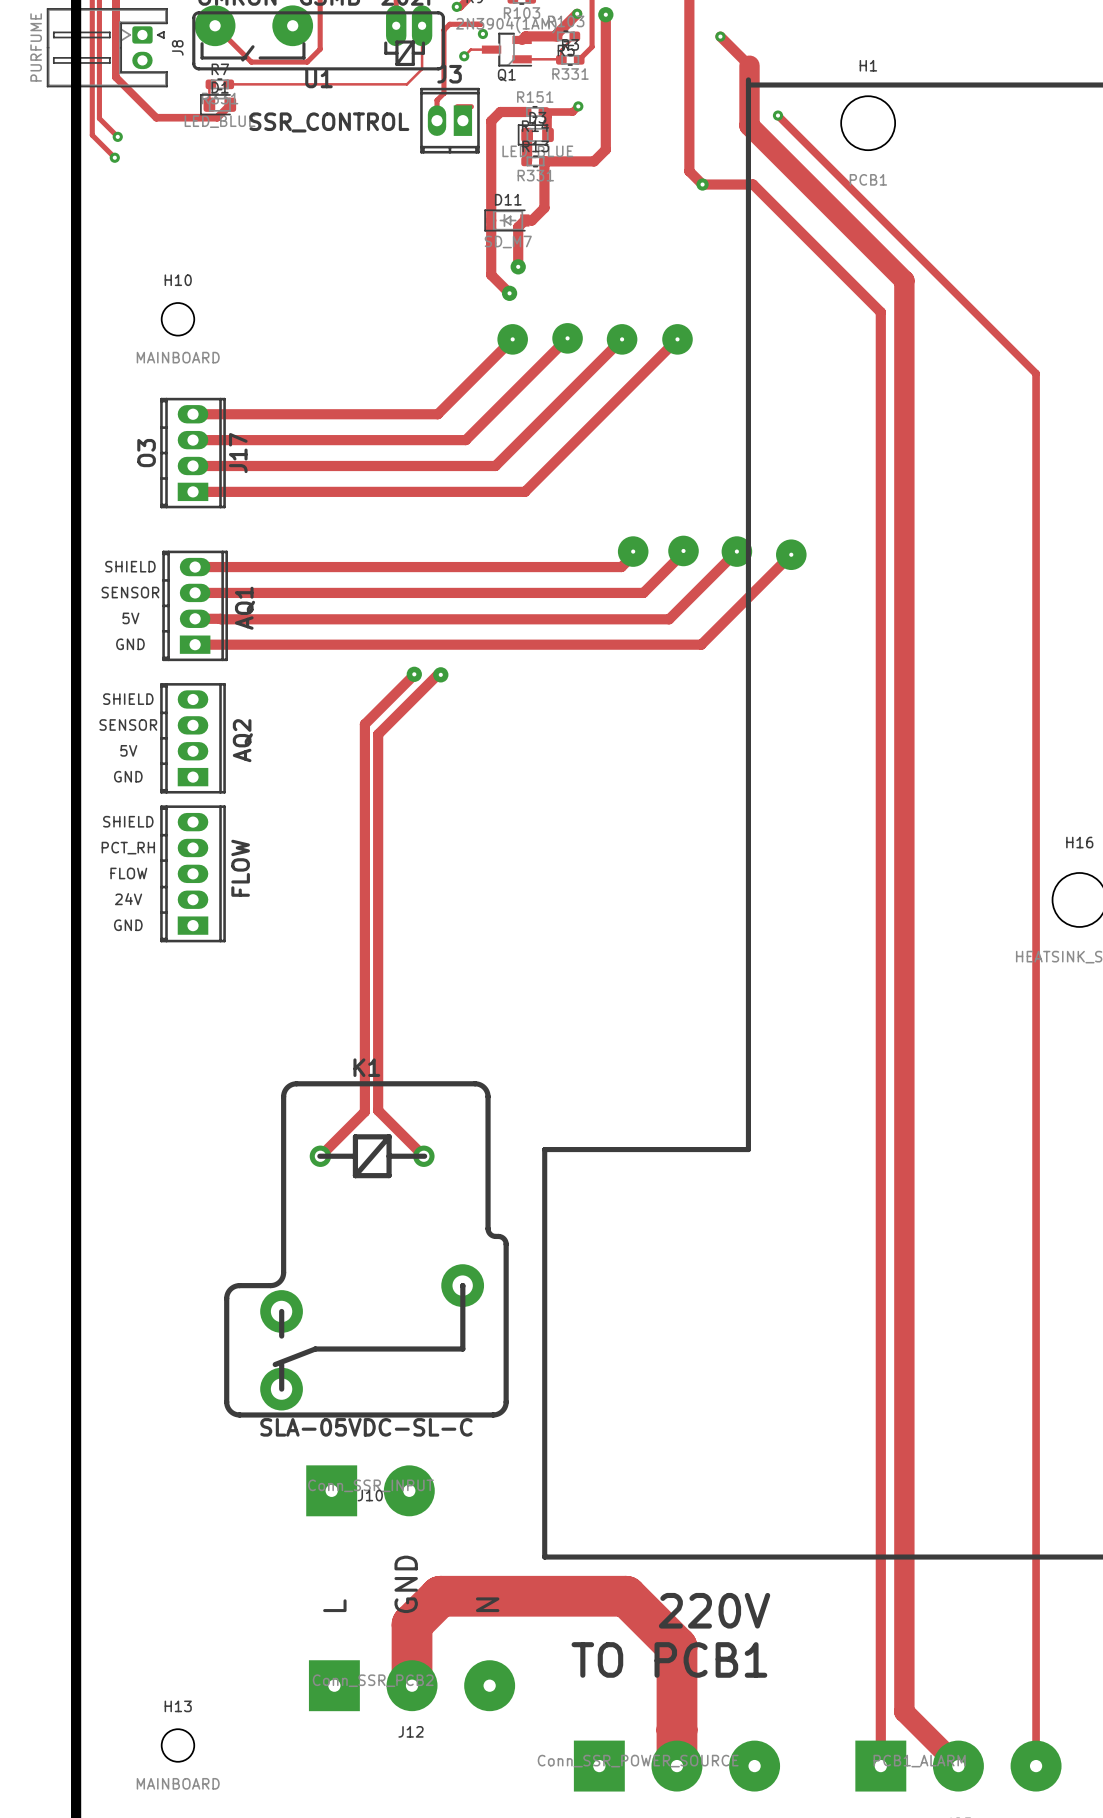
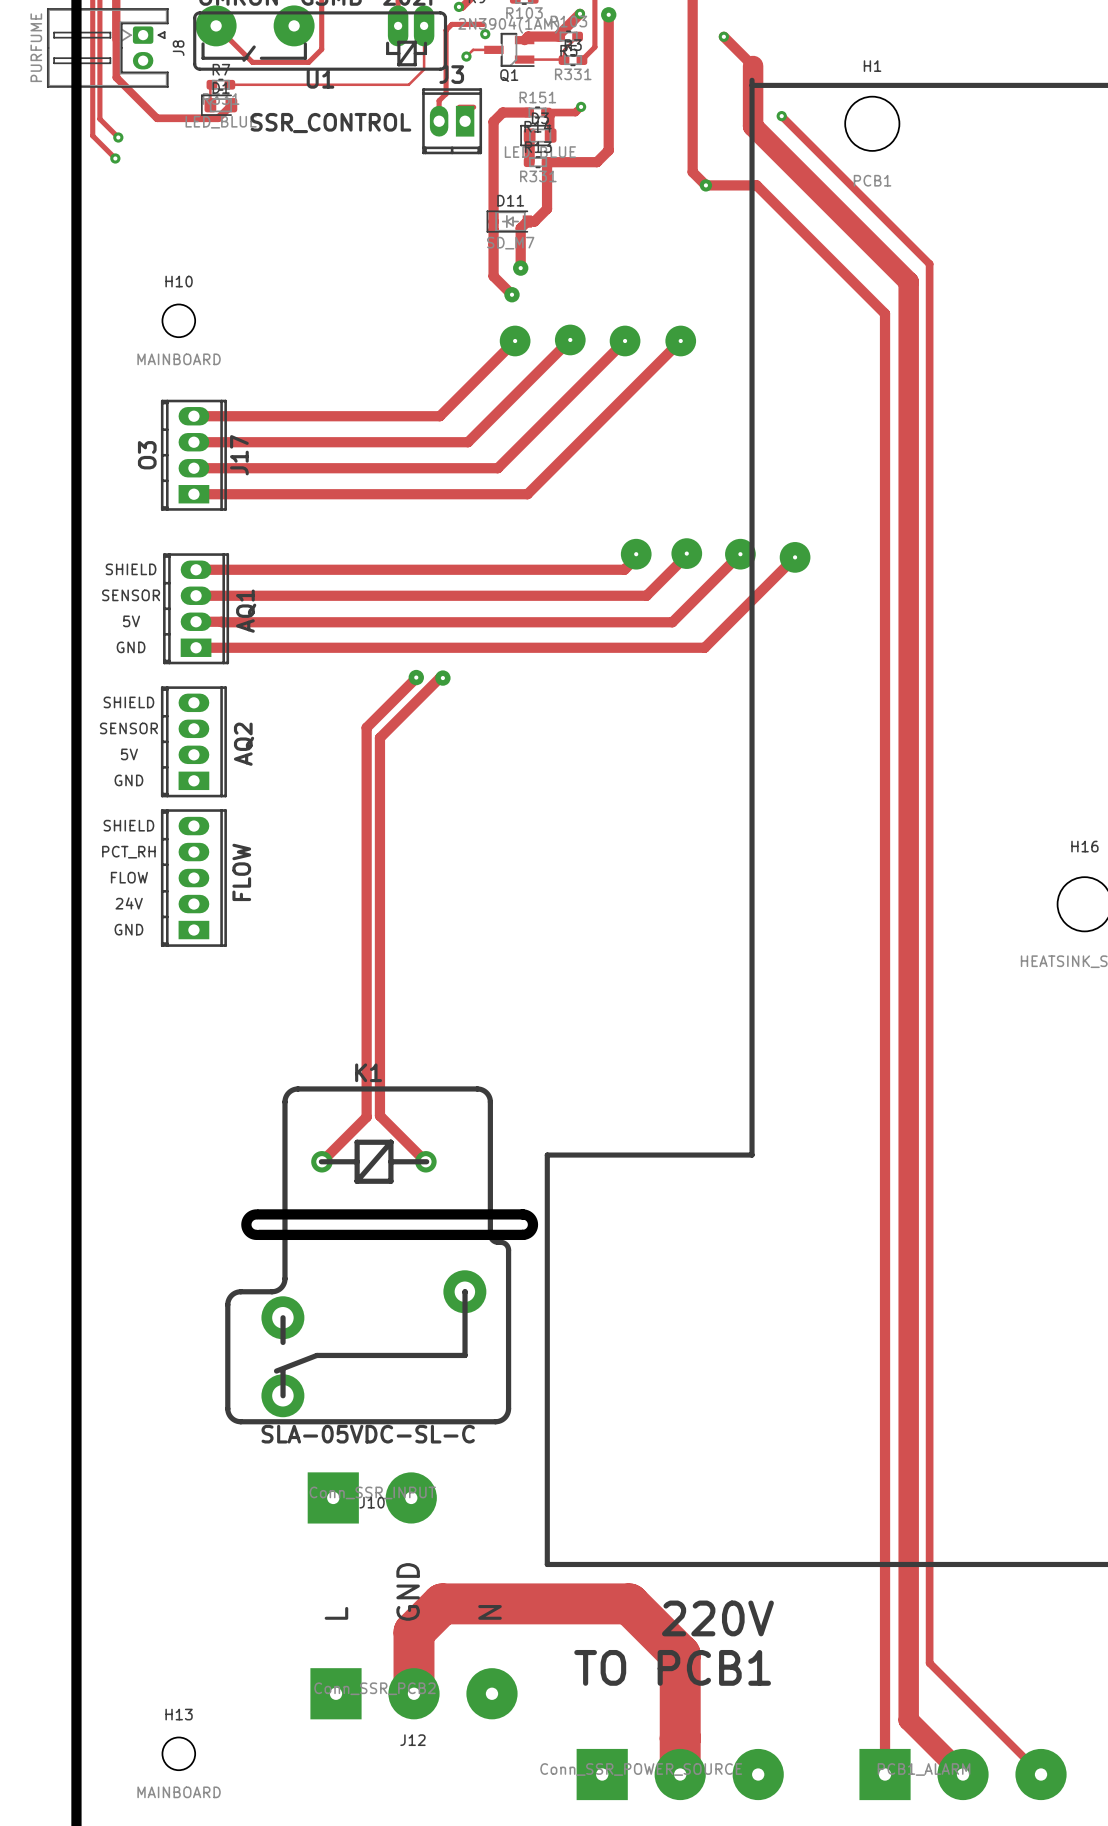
track: (925, 262) (1036, 373) (1036, 1766) -> (929, 264) (929, 1663) (1041, 1774)
board edge: none -> (256, 1214) (249, 1217) (246, 1224) (249, 1231) (256, 1234)
board edge: none -> (259, 1214) (522, 1214) (529, 1217) (532, 1224) (529, 1231) (522, 1234) (259, 1234)

